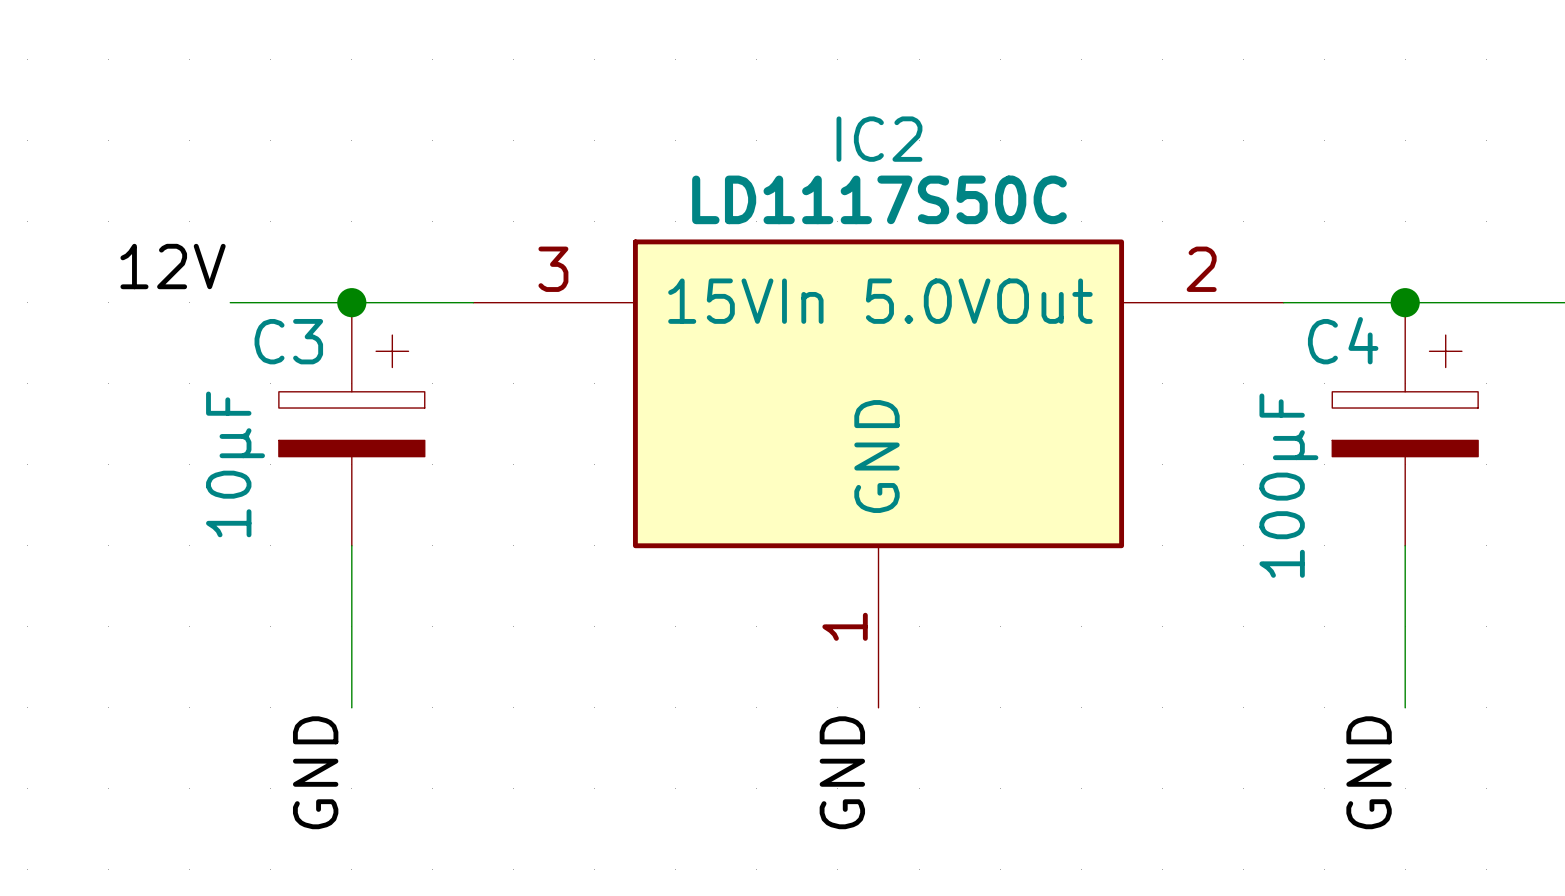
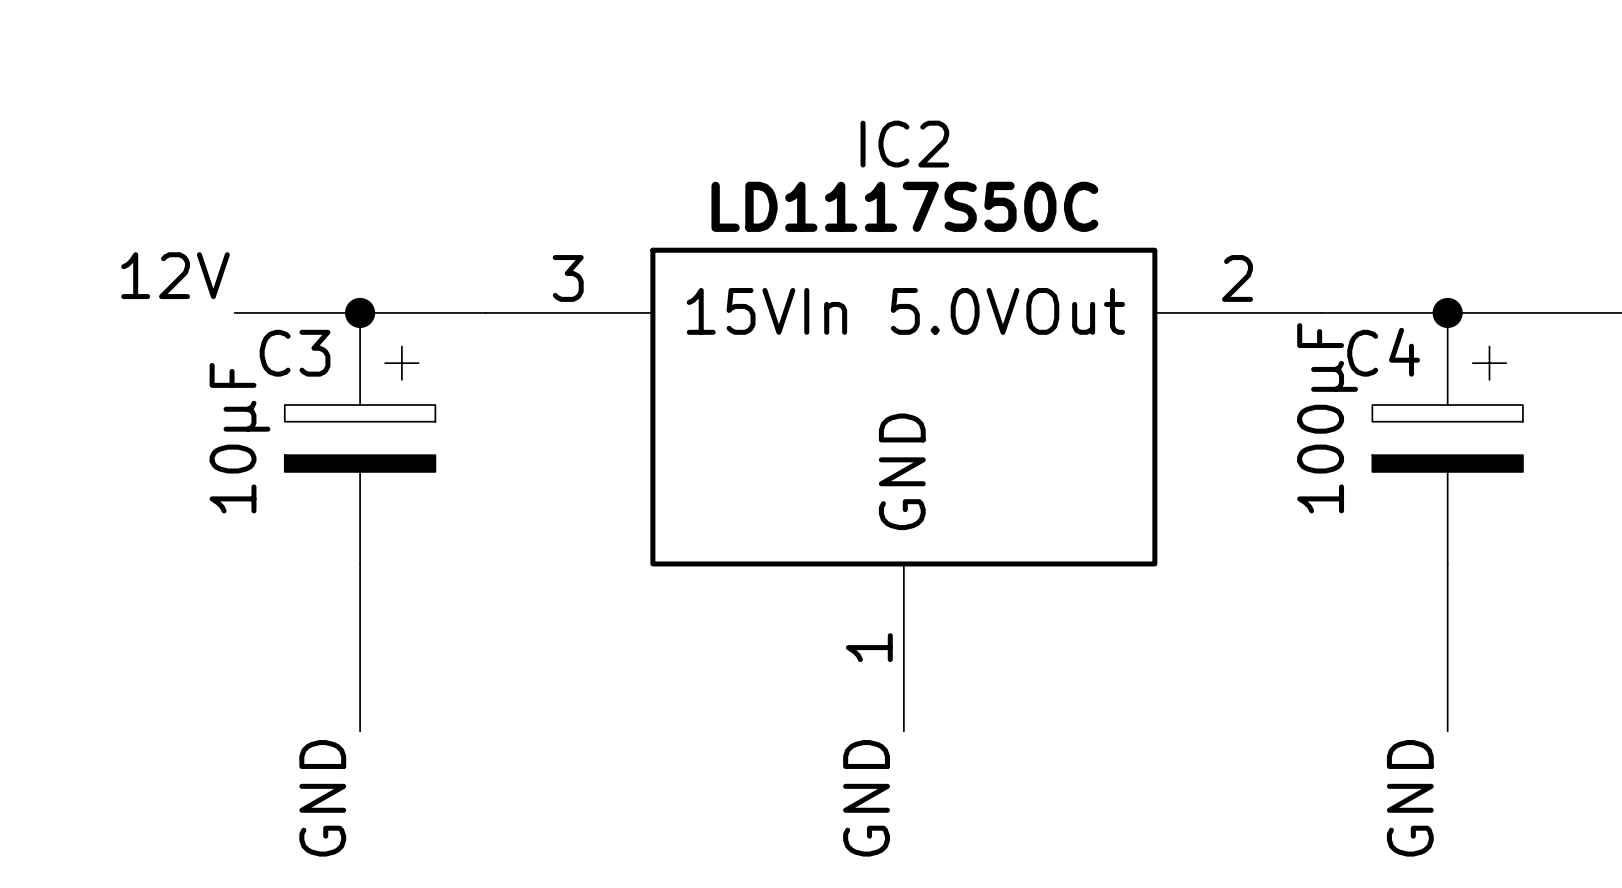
C3 value position: 10μF (235, 464) -> 10μF (240, 438)
C4 value position: 100μF (1288, 485) -> 100μF (1327, 418)

